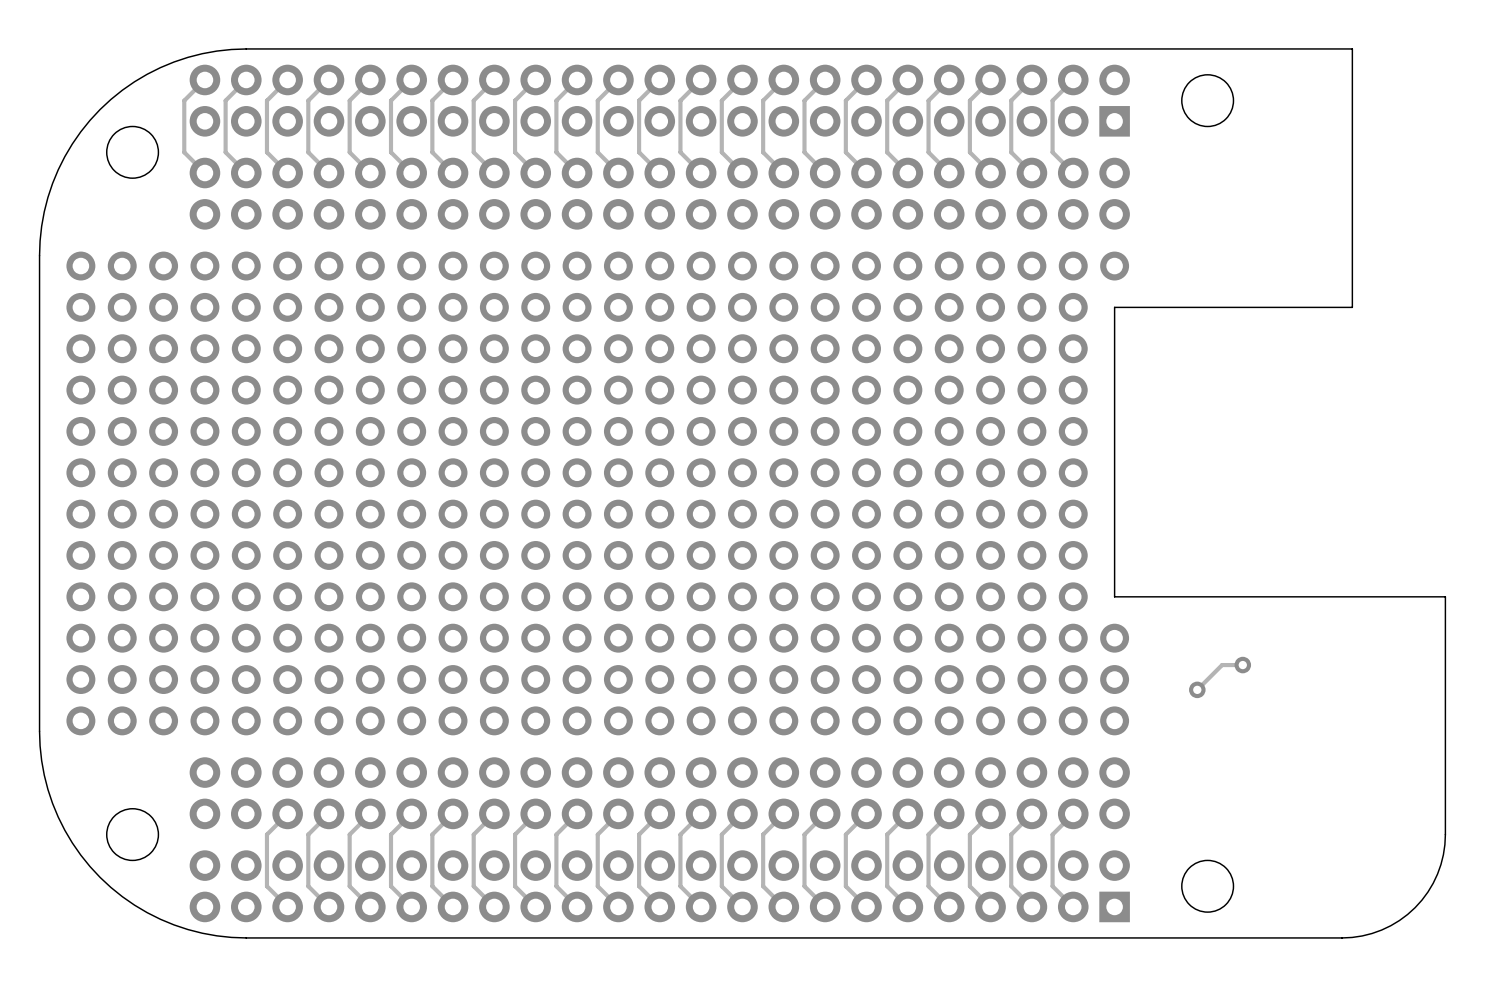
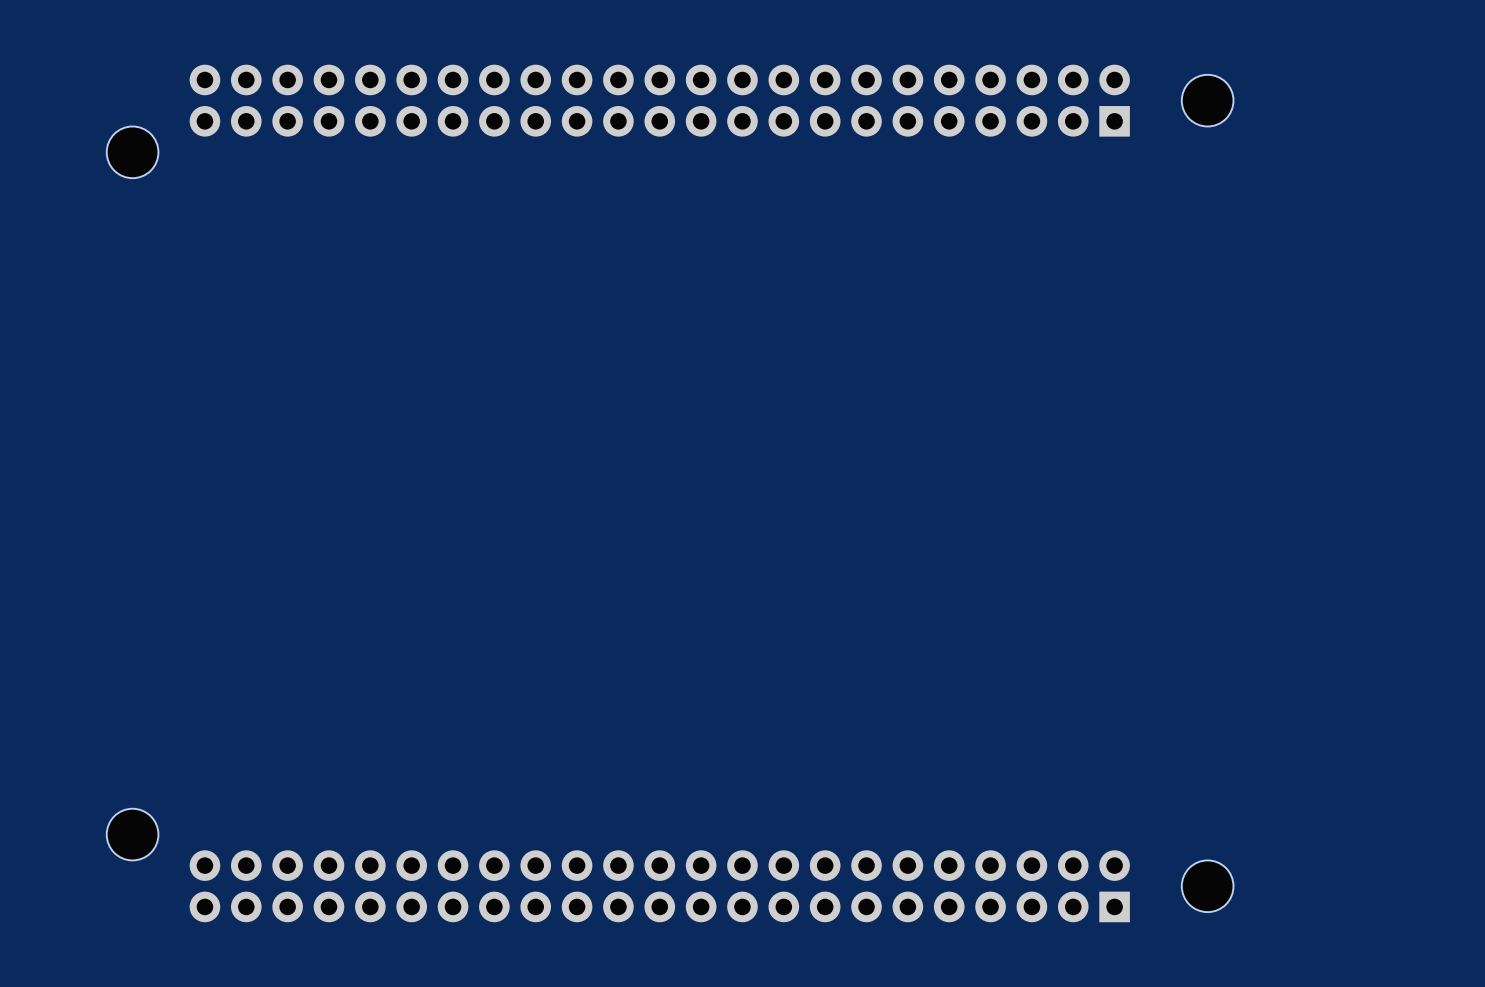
board edge: (1352, 48) (1352, 307) (1114, 307) (1114, 596) (1445, 596) (1444, 844) (1440, 864) (1433, 883) (1421, 900) (1399, 920) (1372, 933) (1342, 937) (231, 937) (188, 929) (147, 912) (122, 896) (100, 877) (72, 842) (52, 803) (44, 775) (40, 745) (40, 240) (47, 197) (64, 156) (80, 131) (100, 109) (134, 81) (160, 67) (188, 57) (216, 51) (246, 48) (1352, 48) -> none
track: (204, 79) (184, 100) (184, 152) (204, 173) -> none
track: (246, 79) (225, 100) (225, 152) (246, 173) -> none
track: (287, 79) (266, 100) (266, 152) (287, 173) -> none
track: (328, 79) (308, 100) (308, 152) (328, 173) -> none
track: (370, 79) (349, 100) (349, 152) (370, 173) -> none
track: (411, 79) (391, 100) (391, 152) (411, 173) -> none
track: (453, 79) (432, 100) (432, 152) (453, 173) -> none
track: (494, 79) (473, 100) (473, 152) (494, 173) -> none
track: (535, 79) (515, 100) (515, 152) (535, 173) -> none
track: (577, 79) (556, 100) (556, 152) (577, 173) -> none
track: (618, 79) (597, 100) (597, 152) (618, 173) -> none
track: (659, 79) (639, 100) (639, 152) (659, 173) -> none
track: (701, 79) (680, 100) (680, 152) (701, 173) -> none
track: (742, 79) (721, 100) (721, 152) (742, 173) -> none
track: (783, 79) (763, 100) (763, 152) (783, 173) -> none
track: (825, 79) (804, 100) (804, 152) (825, 173) -> none
track: (866, 79) (845, 100) (845, 152) (866, 173) -> none
track: (907, 79) (887, 100) (887, 152) (907, 173) -> none
track: (949, 79) (928, 100) (928, 152) (949, 173) -> none
track: (990, 79) (969, 100) (969, 152) (990, 173) -> none
track: (1031, 79) (1011, 100) (1011, 152) (1031, 173) -> none
track: (1073, 79) (1052, 100) (1052, 152) (1073, 173) -> none
part: (659, 173) -> none
part: (659, 214) -> none
via: (80, 266) -> none
via: (122, 266) -> none
via: (163, 266) -> none
via: (204, 266) -> none
via: (246, 266) -> none
via: (287, 266) -> none
via: (328, 266) -> none
via: (370, 266) -> none
via: (411, 266) -> none
via: (453, 266) -> none
via: (494, 266) -> none
via: (535, 266) -> none
via: (577, 266) -> none
via: (618, 266) -> none
via: (659, 266) -> none
via: (701, 266) -> none
via: (742, 266) -> none
via: (783, 266) -> none
via: (825, 266) -> none
via: (866, 266) -> none
via: (907, 266) -> none
via: (949, 266) -> none
via: (990, 266) -> none
via: (1031, 266) -> none
via: (1073, 266) -> none
via: (1114, 266) -> none
via: (80, 307) -> none
via: (122, 307) -> none
via: (163, 307) -> none
via: (204, 307) -> none
via: (246, 307) -> none
via: (287, 307) -> none
via: (328, 307) -> none
via: (370, 307) -> none
via: (411, 307) -> none
via: (453, 307) -> none
via: (494, 307) -> none
via: (535, 307) -> none
via: (577, 307) -> none
via: (618, 307) -> none
via: (659, 307) -> none
via: (701, 307) -> none
via: (742, 307) -> none
via: (783, 307) -> none
via: (825, 307) -> none
via: (866, 307) -> none
via: (907, 307) -> none
via: (949, 307) -> none
via: (990, 307) -> none
via: (1031, 307) -> none
via: (1073, 307) -> none
via: (80, 348) -> none
via: (122, 348) -> none
via: (163, 348) -> none
via: (204, 348) -> none
via: (246, 348) -> none
via: (287, 348) -> none
via: (328, 348) -> none
via: (370, 348) -> none
via: (411, 348) -> none
via: (453, 348) -> none
via: (494, 348) -> none
via: (535, 348) -> none
via: (577, 348) -> none
via: (618, 348) -> none
via: (659, 348) -> none
via: (701, 348) -> none
via: (742, 348) -> none
via: (783, 348) -> none
via: (825, 348) -> none
via: (866, 348) -> none
via: (907, 348) -> none
via: (949, 348) -> none
via: (990, 348) -> none
via: (1031, 348) -> none
via: (1073, 348) -> none
via: (80, 390) -> none
via: (122, 390) -> none
via: (163, 390) -> none
via: (204, 390) -> none
via: (246, 390) -> none
via: (287, 390) -> none
via: (328, 390) -> none
via: (370, 390) -> none
via: (411, 390) -> none
via: (453, 390) -> none
via: (494, 390) -> none
via: (535, 390) -> none
via: (577, 390) -> none
via: (618, 390) -> none
via: (659, 390) -> none
via: (701, 390) -> none
via: (742, 390) -> none
via: (783, 390) -> none
via: (825, 390) -> none
via: (866, 390) -> none
via: (907, 390) -> none
via: (949, 390) -> none
via: (990, 390) -> none
via: (1031, 390) -> none
via: (1073, 390) -> none
via: (80, 431) -> none
via: (122, 431) -> none
via: (163, 431) -> none
via: (204, 431) -> none
via: (246, 431) -> none
via: (287, 431) -> none
via: (328, 431) -> none
via: (370, 431) -> none
via: (411, 431) -> none
via: (453, 431) -> none
via: (494, 431) -> none
via: (535, 431) -> none
via: (577, 431) -> none
via: (618, 431) -> none
via: (659, 431) -> none
via: (701, 431) -> none
via: (742, 431) -> none
via: (783, 431) -> none
via: (825, 431) -> none
via: (866, 431) -> none
via: (907, 431) -> none
via: (949, 431) -> none
via: (990, 431) -> none
via: (1031, 431) -> none
via: (1073, 431) -> none
via: (80, 472) -> none
via: (122, 472) -> none
via: (163, 472) -> none
via: (204, 472) -> none
via: (246, 472) -> none
via: (287, 472) -> none
via: (328, 472) -> none
via: (370, 472) -> none
via: (411, 472) -> none
via: (453, 472) -> none
via: (494, 472) -> none
via: (535, 472) -> none
via: (577, 472) -> none
via: (618, 472) -> none
via: (659, 472) -> none
via: (701, 472) -> none
via: (742, 472) -> none
via: (783, 472) -> none
via: (825, 472) -> none
via: (866, 472) -> none
via: (907, 472) -> none
via: (949, 472) -> none
via: (990, 472) -> none
via: (1031, 472) -> none
via: (1073, 472) -> none
via: (80, 514) -> none
via: (122, 514) -> none
via: (163, 514) -> none
via: (204, 514) -> none
via: (246, 514) -> none
via: (287, 514) -> none
via: (328, 514) -> none
via: (370, 514) -> none
via: (411, 514) -> none
via: (453, 514) -> none
via: (494, 514) -> none
via: (535, 514) -> none
via: (577, 514) -> none
via: (618, 514) -> none
via: (659, 514) -> none
via: (701, 514) -> none
via: (742, 514) -> none
via: (783, 514) -> none
via: (825, 514) -> none
via: (866, 514) -> none
via: (907, 514) -> none
via: (949, 514) -> none
via: (990, 514) -> none
via: (1031, 514) -> none
via: (1073, 514) -> none
via: (80, 555) -> none
via: (122, 555) -> none
via: (163, 555) -> none
via: (204, 555) -> none
via: (246, 555) -> none
via: (287, 555) -> none
via: (328, 555) -> none
via: (370, 555) -> none
via: (411, 555) -> none
via: (453, 555) -> none
via: (494, 555) -> none
via: (535, 555) -> none
via: (577, 555) -> none
via: (618, 555) -> none
via: (659, 555) -> none
via: (701, 555) -> none
via: (742, 555) -> none
via: (783, 555) -> none
via: (825, 555) -> none
via: (866, 555) -> none
via: (907, 555) -> none
via: (949, 555) -> none
via: (990, 555) -> none
via: (1031, 555) -> none
via: (1073, 555) -> none
via: (80, 596) -> none
via: (122, 596) -> none
via: (163, 596) -> none
via: (204, 596) -> none
via: (246, 596) -> none
via: (287, 596) -> none
via: (328, 596) -> none
via: (370, 596) -> none
via: (411, 596) -> none
via: (453, 596) -> none
via: (494, 596) -> none
via: (535, 596) -> none
via: (577, 596) -> none
via: (618, 596) -> none
via: (659, 596) -> none
via: (701, 596) -> none
via: (742, 596) -> none
via: (783, 596) -> none
via: (825, 596) -> none
via: (866, 596) -> none
via: (907, 596) -> none
via: (949, 596) -> none
via: (990, 596) -> none
via: (1031, 596) -> none
via: (1073, 596) -> none
via: (80, 638) -> none
via: (122, 638) -> none
via: (163, 638) -> none
via: (204, 638) -> none
via: (246, 638) -> none
via: (287, 638) -> none
via: (328, 638) -> none
via: (370, 638) -> none
via: (411, 638) -> none
via: (453, 638) -> none
via: (494, 638) -> none
via: (535, 638) -> none
via: (577, 638) -> none
via: (618, 638) -> none
via: (659, 638) -> none
via: (701, 638) -> none
via: (742, 638) -> none
via: (783, 638) -> none
via: (825, 638) -> none
via: (866, 638) -> none
via: (907, 638) -> none
via: (949, 638) -> none
via: (990, 638) -> none
via: (1031, 638) -> none
via: (1073, 638) -> none
via: (1114, 638) -> none
track: (1242, 665) (1222, 665) (1197, 689) -> none
via: (1242, 665) -> none
via: (80, 679) -> none
via: (122, 679) -> none
via: (163, 679) -> none
via: (204, 679) -> none
via: (246, 679) -> none
via: (287, 679) -> none
via: (328, 679) -> none
via: (370, 679) -> none
via: (411, 679) -> none
via: (453, 679) -> none
via: (494, 679) -> none
via: (535, 679) -> none
via: (577, 679) -> none
via: (618, 679) -> none
via: (659, 679) -> none
via: (701, 679) -> none
via: (742, 679) -> none
via: (783, 679) -> none
via: (825, 679) -> none
via: (866, 679) -> none
via: (907, 679) -> none
via: (949, 679) -> none
via: (990, 679) -> none
via: (1031, 679) -> none
via: (1073, 679) -> none
via: (1114, 679) -> none
via: (1197, 689) -> none
via: (80, 720) -> none
via: (122, 720) -> none
via: (163, 720) -> none
via: (204, 720) -> none
via: (246, 720) -> none
via: (287, 720) -> none
via: (328, 720) -> none
via: (370, 720) -> none
via: (411, 720) -> none
via: (453, 720) -> none
via: (494, 720) -> none
via: (535, 720) -> none
via: (577, 720) -> none
via: (618, 720) -> none
via: (659, 720) -> none
via: (701, 720) -> none
via: (742, 720) -> none
via: (783, 720) -> none
via: (825, 720) -> none
via: (866, 720) -> none
via: (907, 720) -> none
via: (949, 720) -> none
via: (990, 720) -> none
via: (1031, 720) -> none
via: (1073, 720) -> none
via: (1114, 720) -> none
part: (659, 772) -> none
track: (287, 813) (266, 834) (266, 886) (287, 906) -> none
track: (328, 813) (308, 834) (308, 886) (328, 906) -> none
track: (370, 813) (349, 834) (349, 886) (370, 906) -> none
track: (411, 813) (391, 834) (391, 886) (411, 906) -> none
track: (453, 813) (432, 834) (432, 886) (453, 906) -> none
track: (494, 813) (473, 834) (473, 886) (494, 906) -> none
track: (535, 813) (515, 834) (515, 886) (535, 906) -> none
track: (577, 813) (556, 834) (556, 886) (577, 906) -> none
track: (618, 813) (597, 834) (597, 886) (618, 906) -> none
track: (659, 813) (639, 834) (639, 886) (659, 906) -> none
part: (659, 813) -> none
track: (701, 813) (680, 834) (680, 886) (701, 906) -> none
track: (742, 813) (721, 834) (721, 886) (742, 906) -> none
track: (783, 813) (763, 834) (763, 886) (783, 906) -> none
track: (825, 813) (804, 834) (804, 886) (825, 906) -> none
track: (866, 813) (845, 834) (845, 886) (866, 906) -> none
track: (907, 813) (887, 834) (887, 886) (907, 906) -> none
track: (949, 813) (928, 834) (928, 886) (949, 906) -> none
track: (990, 813) (969, 834) (969, 886) (990, 906) -> none
track: (1031, 813) (1011, 834) (1011, 886) (1031, 906) -> none
track: (1073, 813) (1052, 834) (1052, 886) (1073, 906) -> none

